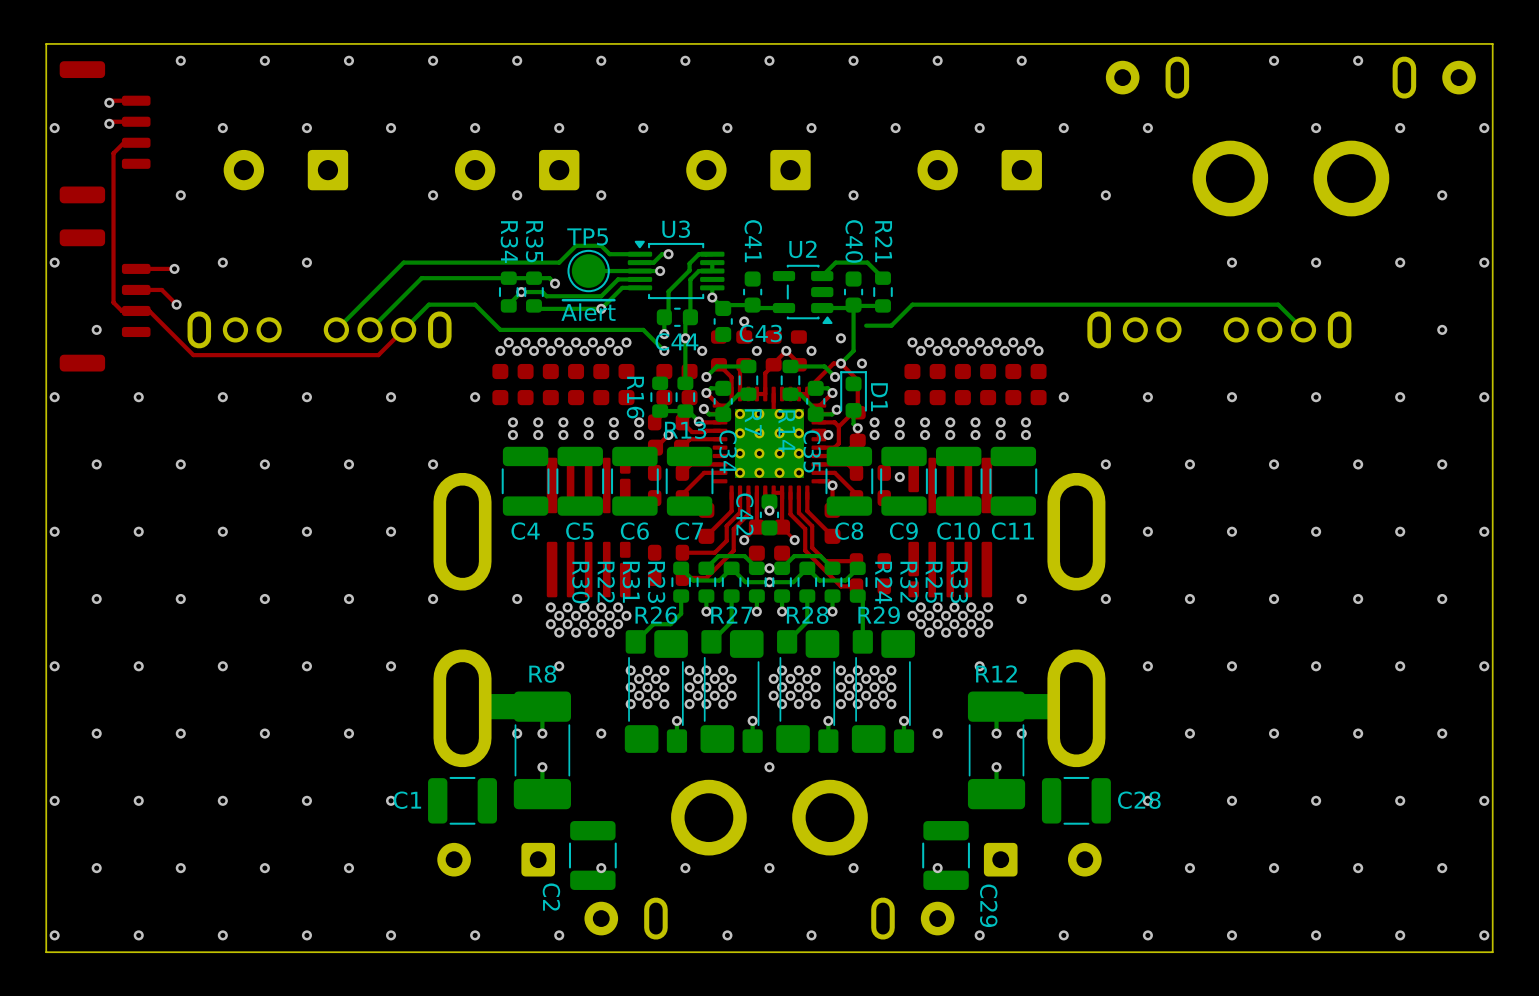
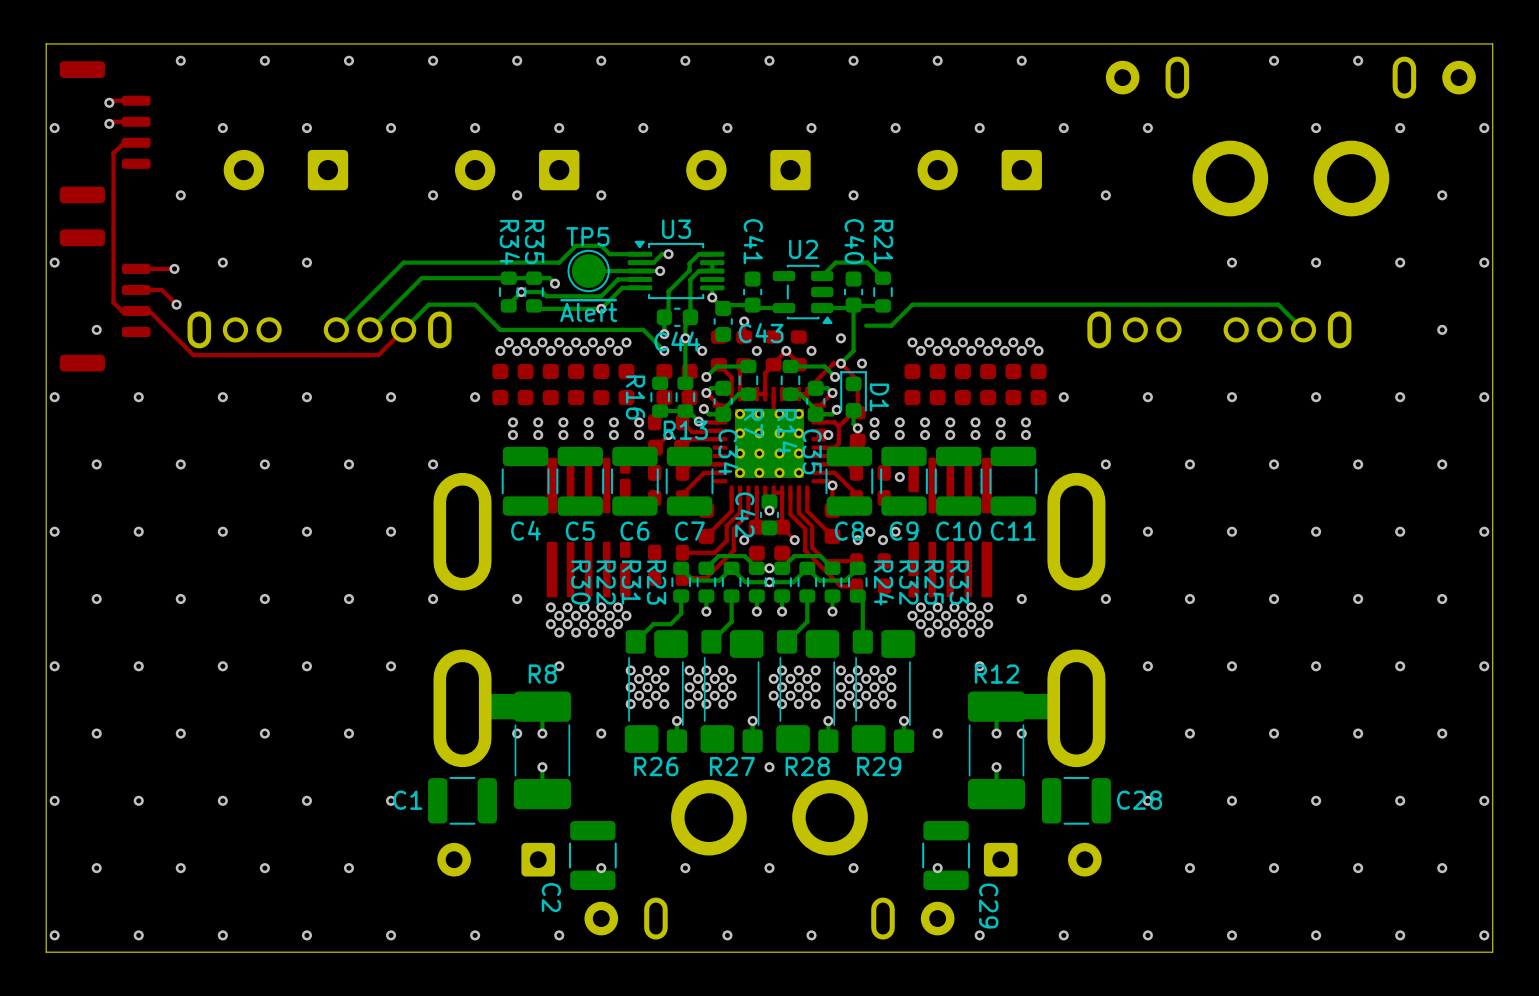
via: none -> (870, 531)
via: none -> (895, 531)
via: none -> (857, 540)
via: none -> (883, 540)
R26 name position: R26 (656, 615) -> R26 (656, 766)
R27 name position: R27 (731, 615) -> R27 (732, 766)
R28 name position: R28 (807, 615) -> R28 (807, 766)
R29 name position: R29 (879, 615) -> R29 (879, 766)

